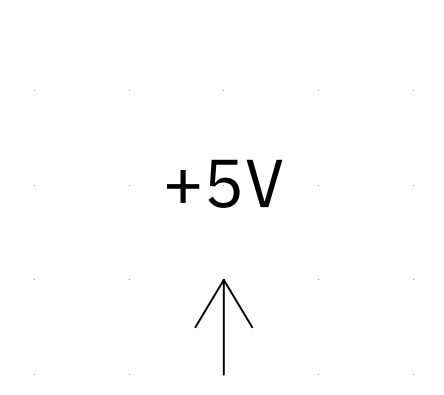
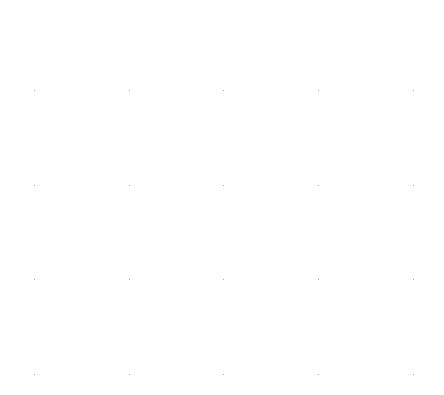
power symbol: +5V (223, 327) -> none

